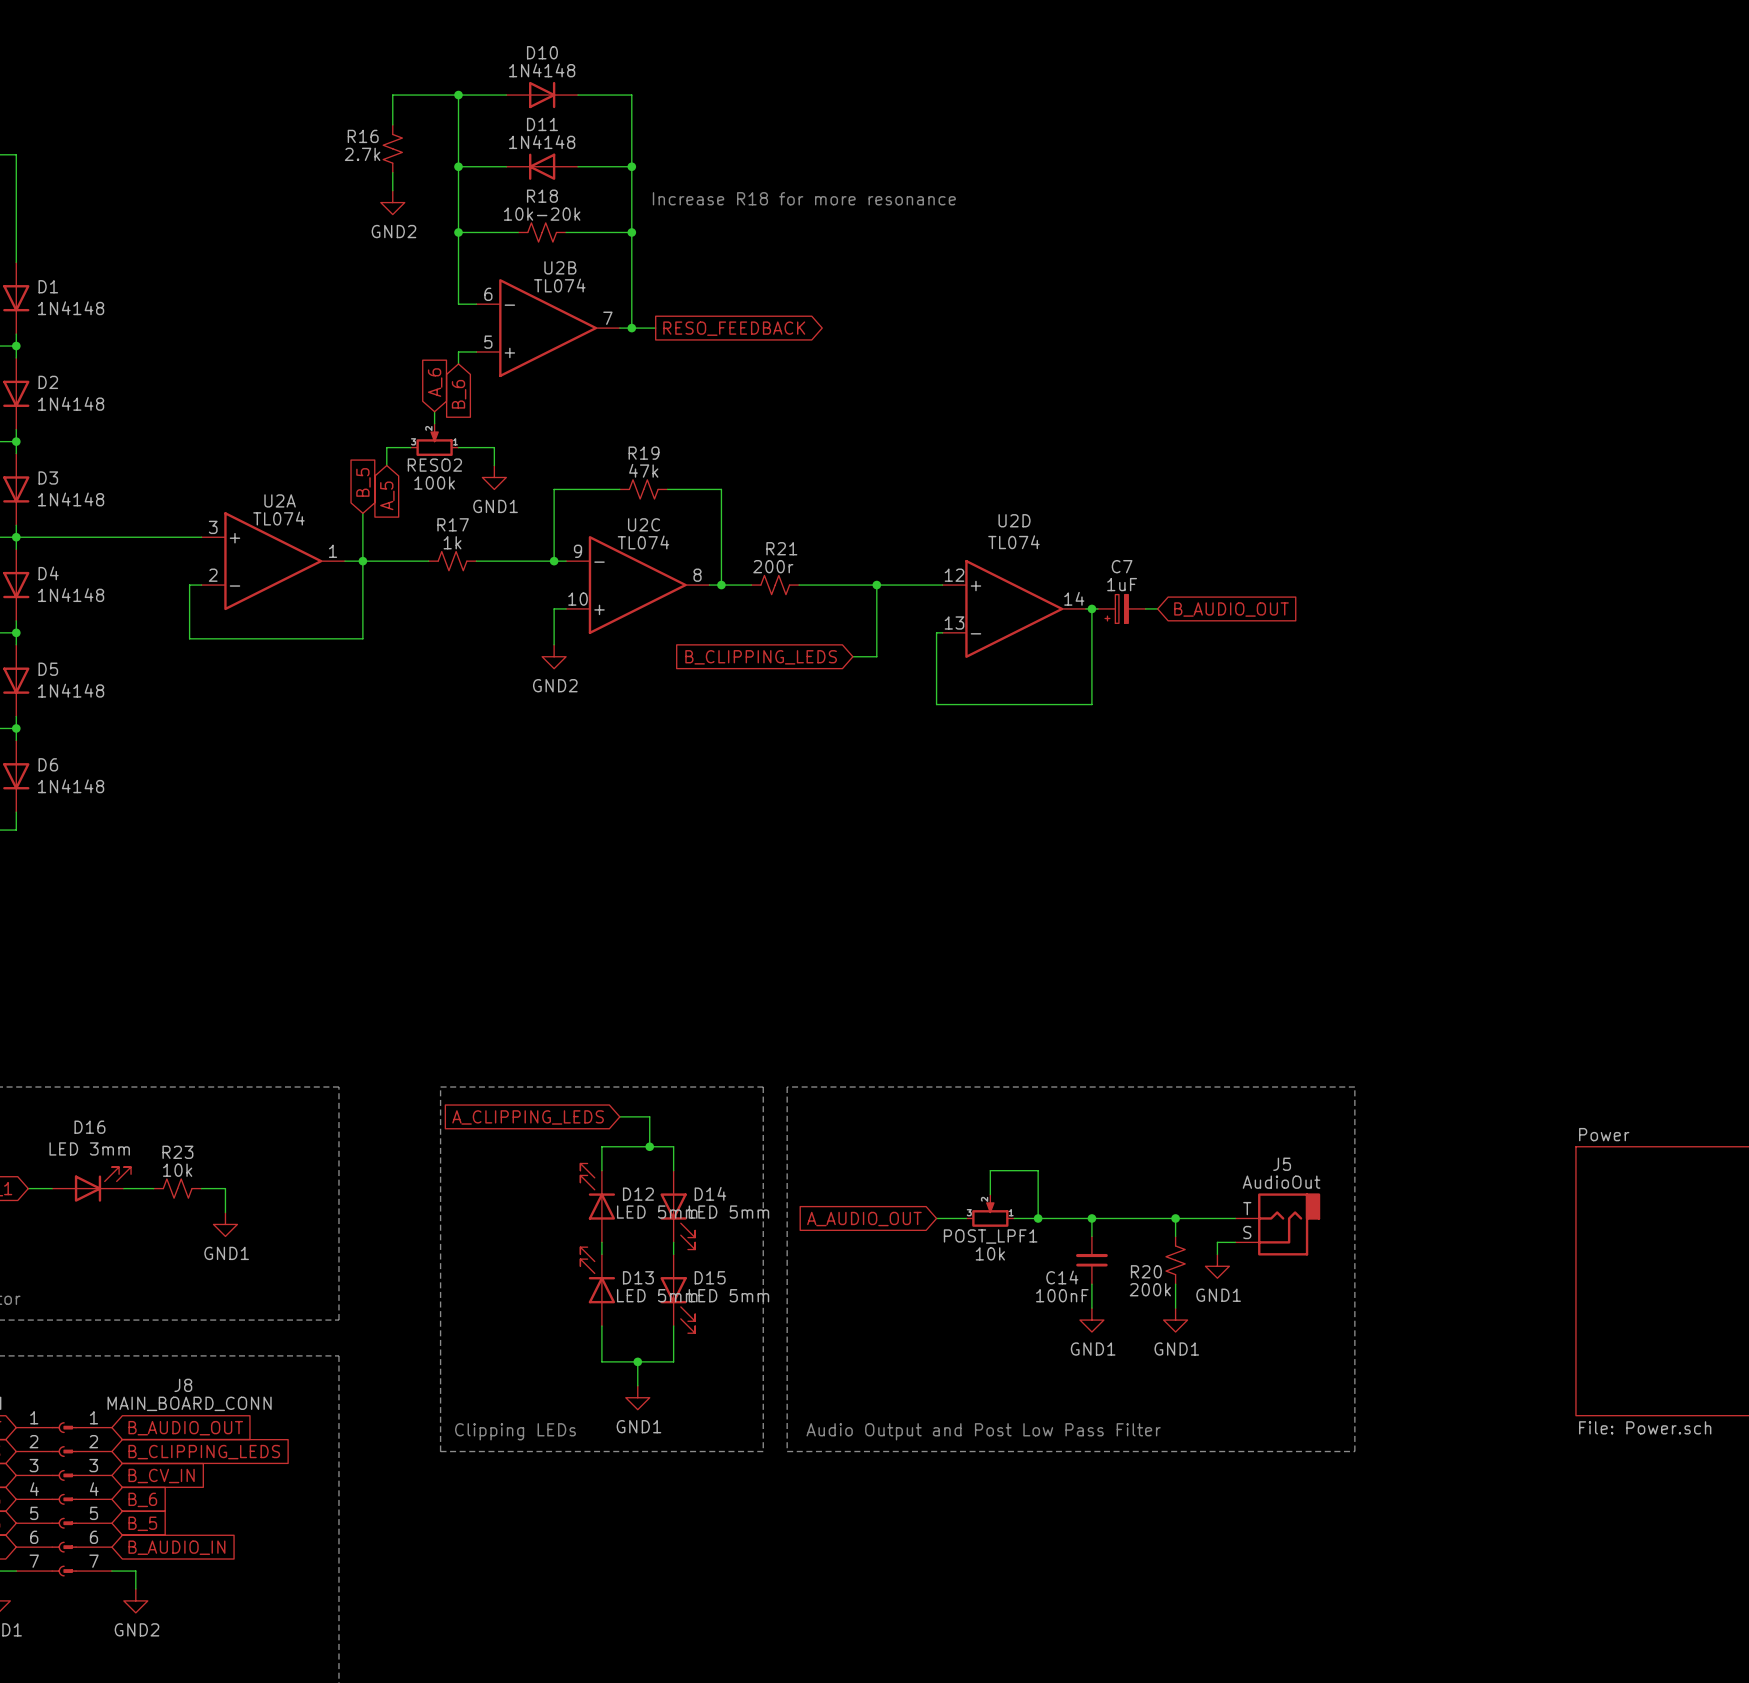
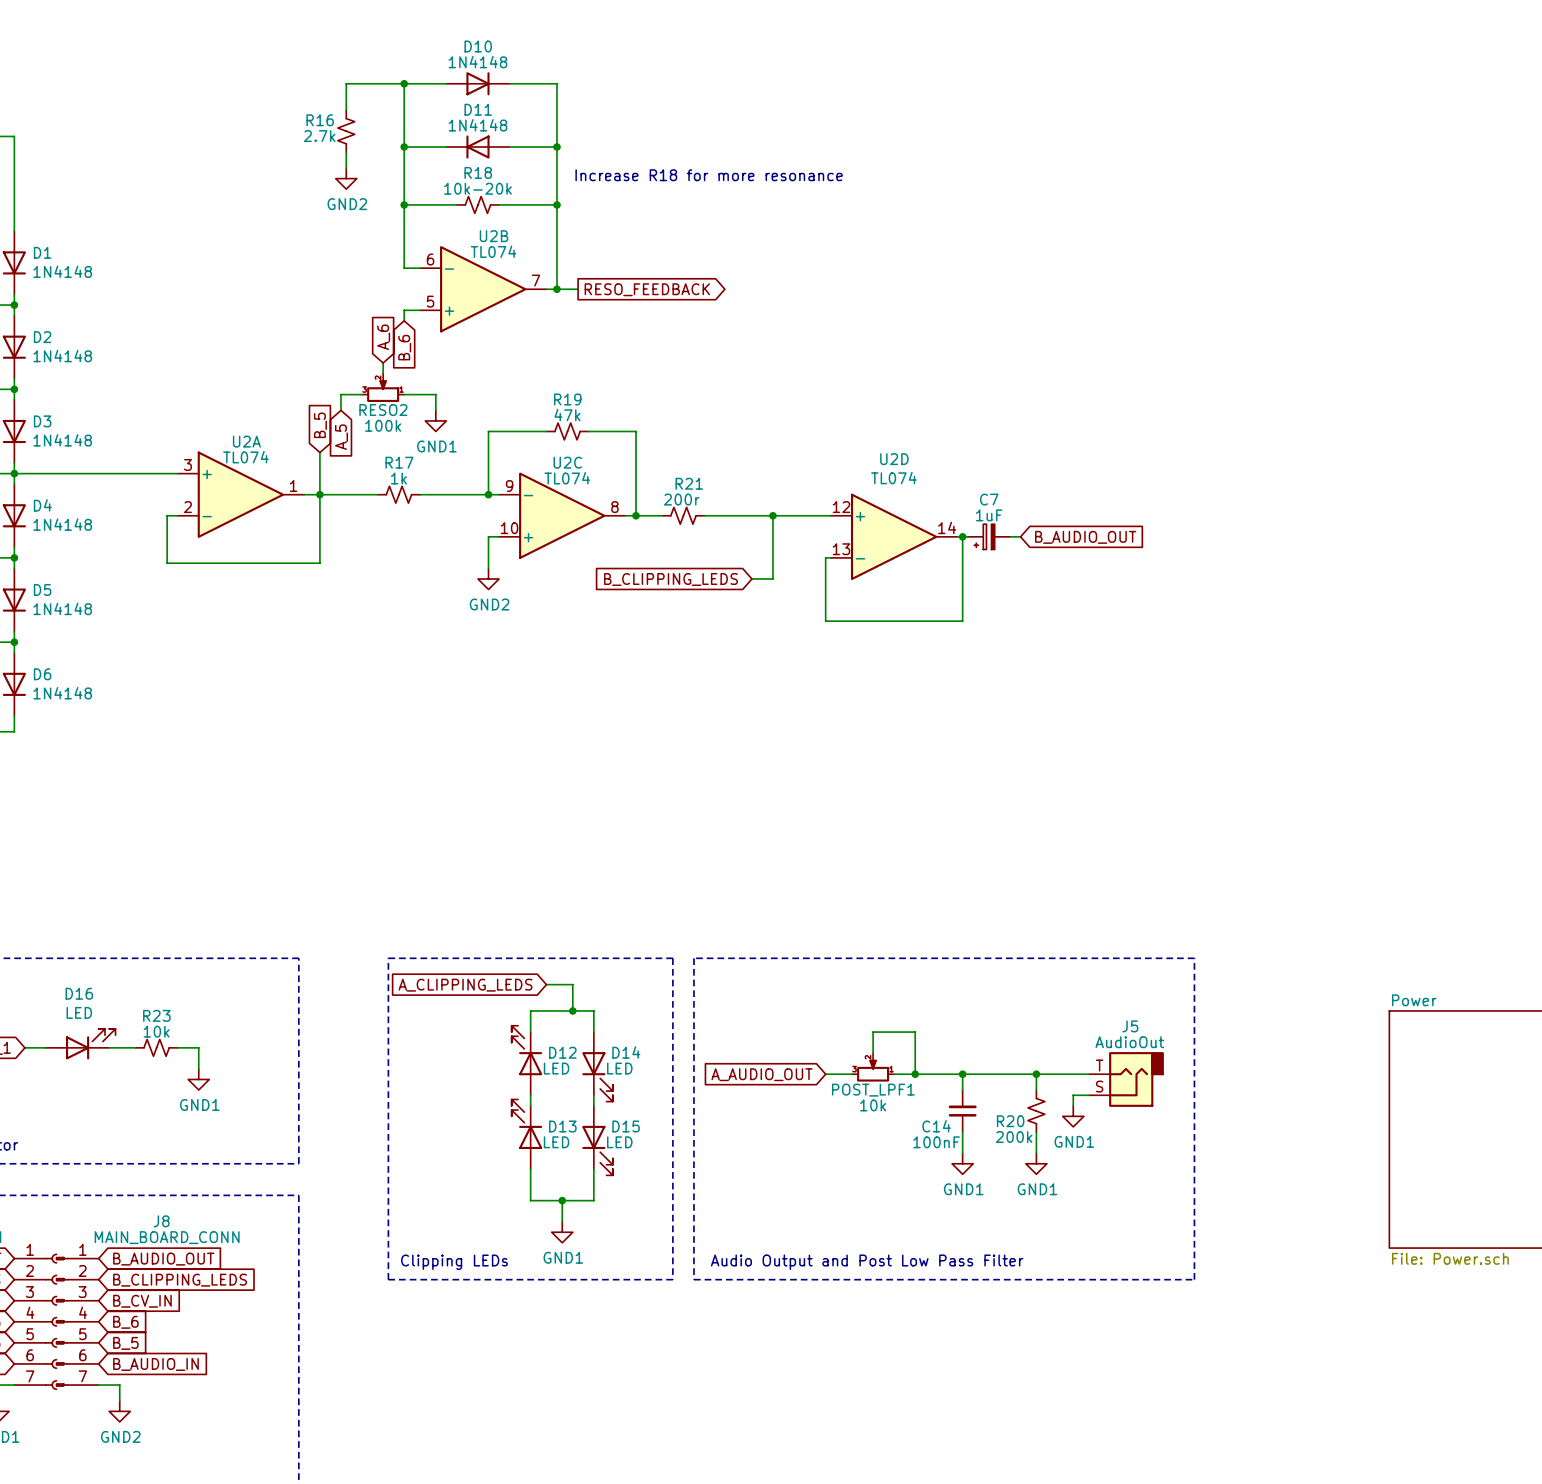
D16 value: LED 3mm (89, 1148) -> LED (79, 1012)
D12 value: LED 5mm (657, 1212) -> LED (556, 1068)
D14 value: LED 5mm (728, 1212) -> LED (619, 1068)
D13 value: LED 5mm (657, 1295) -> LED (556, 1142)
D15 value: LED 5mm (728, 1295) -> LED (619, 1142)

